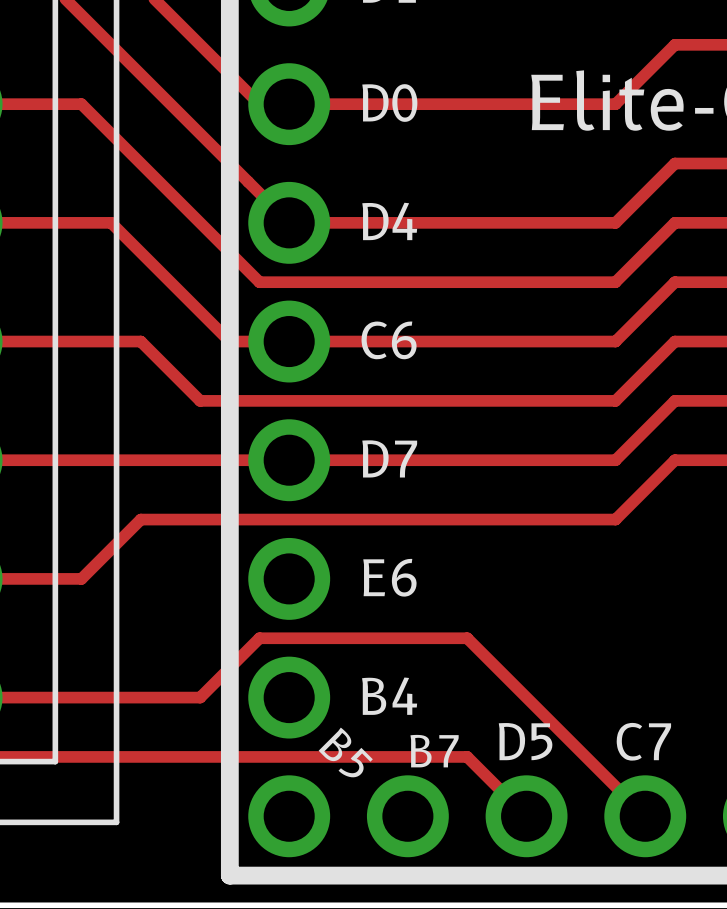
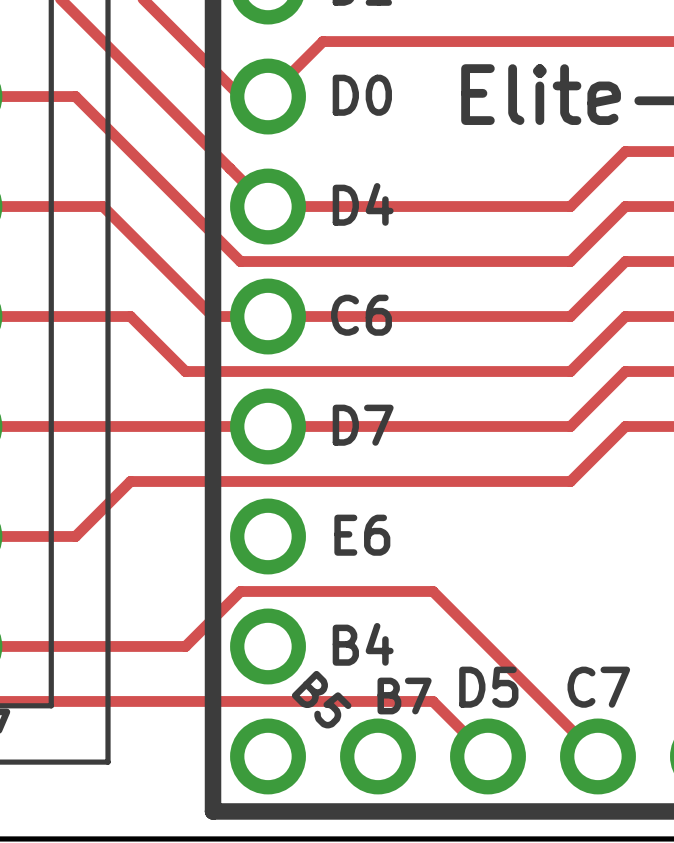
track: (674, 44) (615, 104) (289, 104) -> (625, 41) (323, 41) (268, 96)

